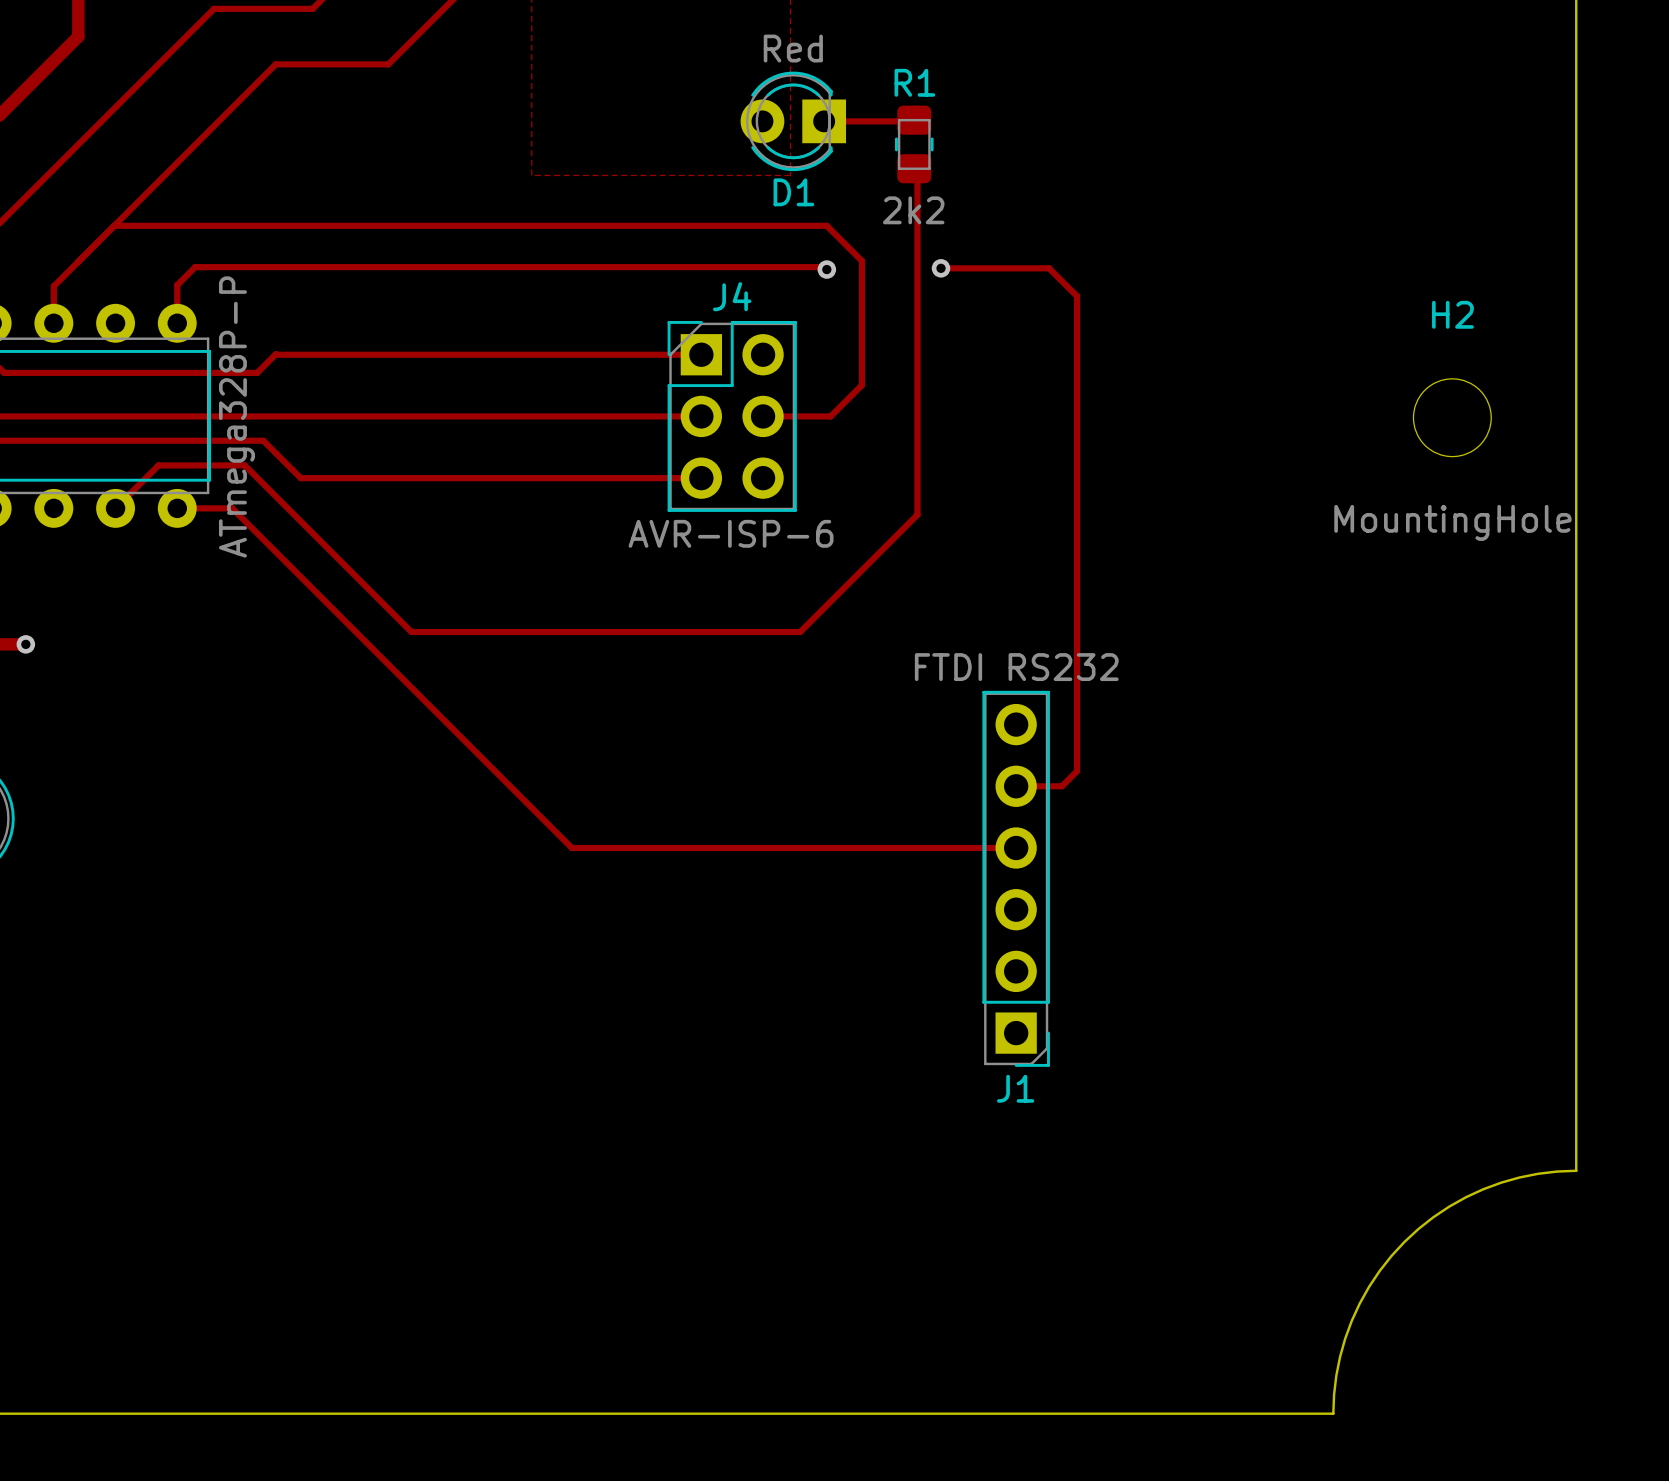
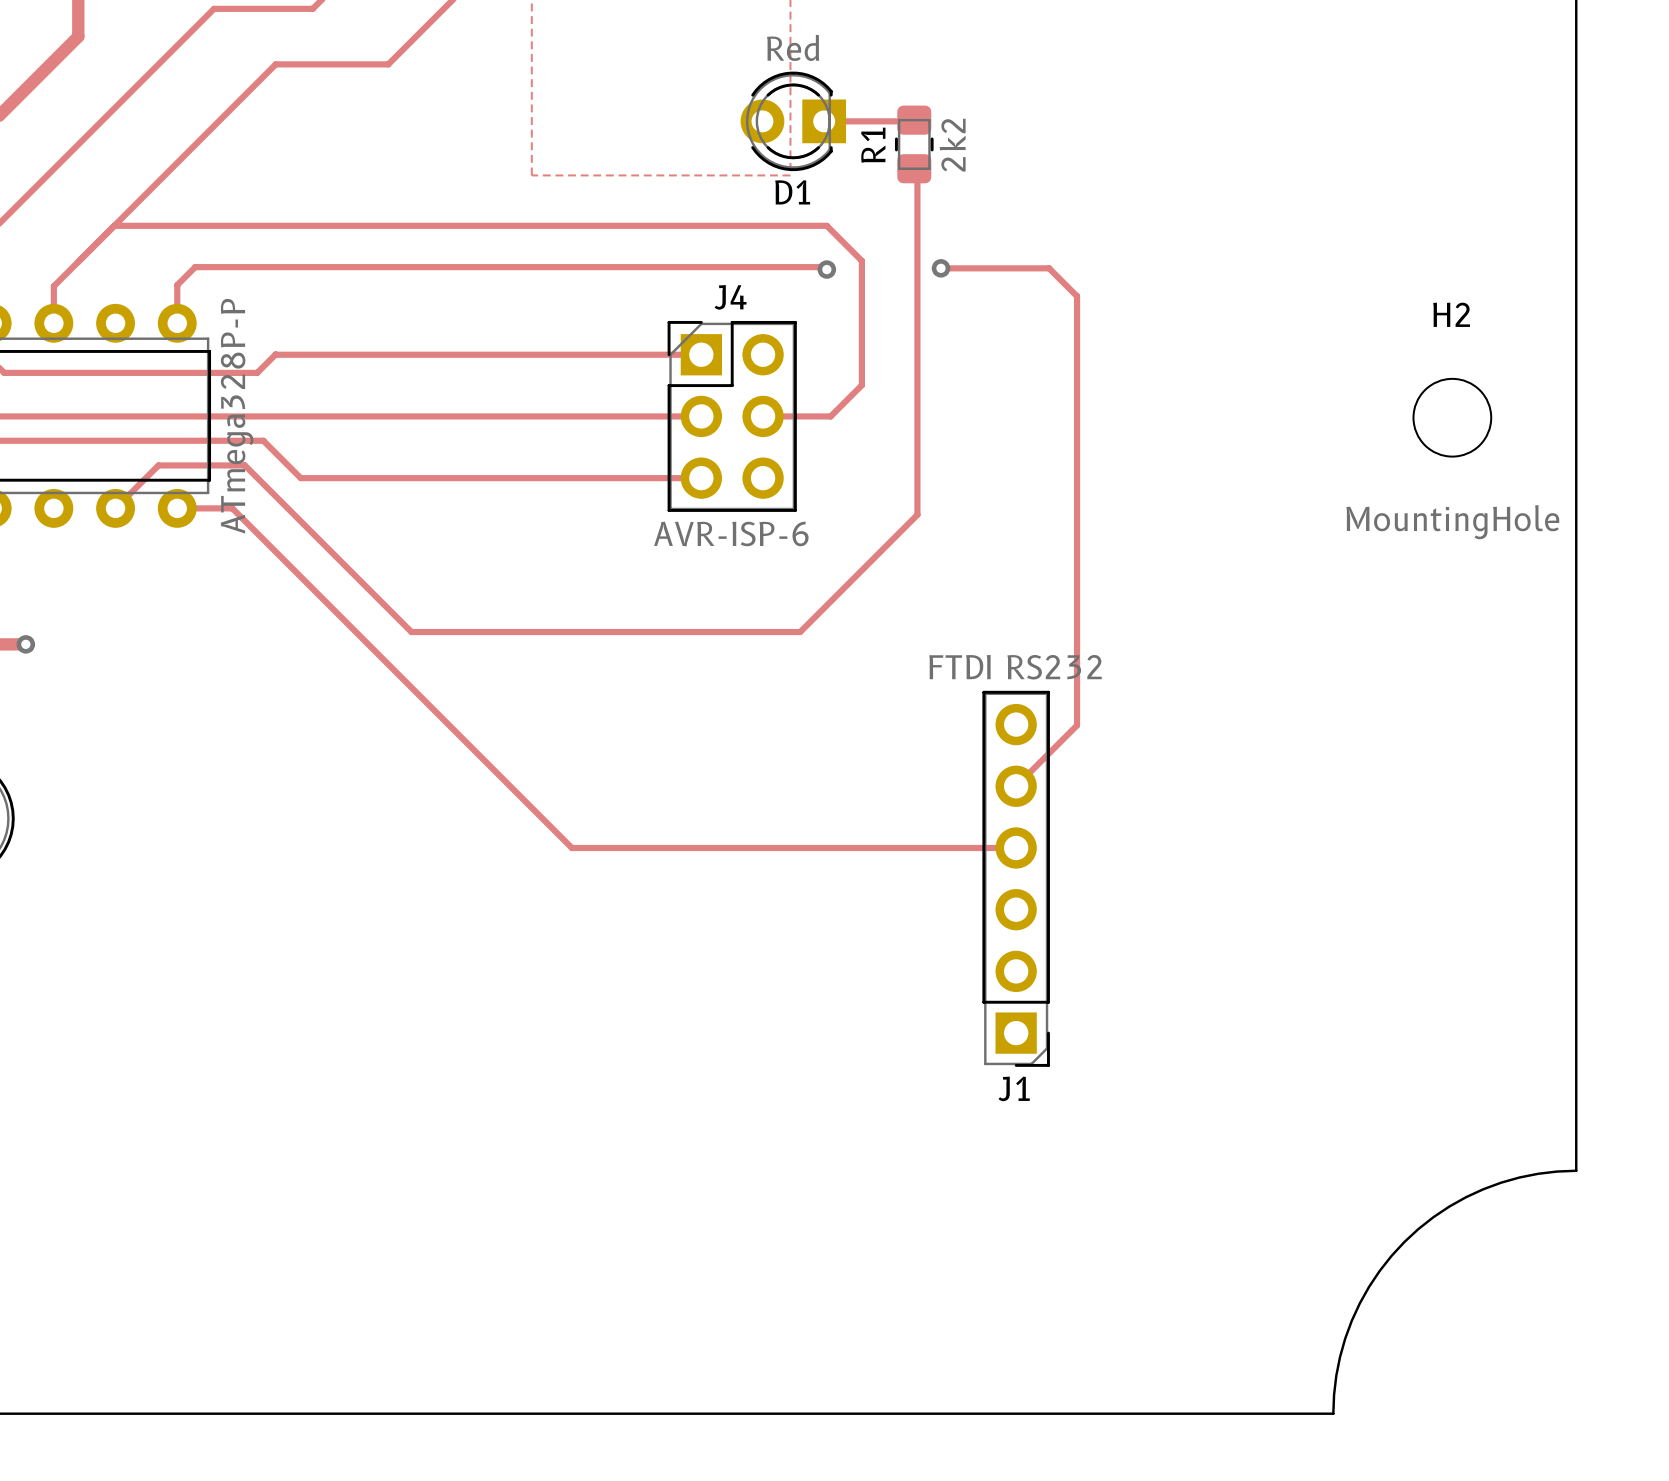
R1 name rotation: 0° (914, 82) -> 90° counterclockwise (873, 145)
R1 name position: R1 (914, 82) -> R1 (873, 145)
R1 value rotation: 0° (913, 210) -> 90° counterclockwise (952, 145)
track: (1077, 725) (1077, 771) (1061, 786) (1016, 786) -> (1077, 725) (1016, 786)

